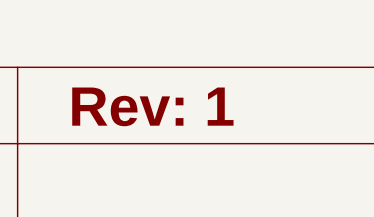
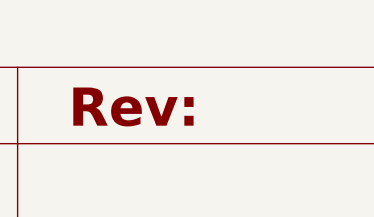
title block: Rev: 1 (152, 106) -> Rev: (133, 106)

